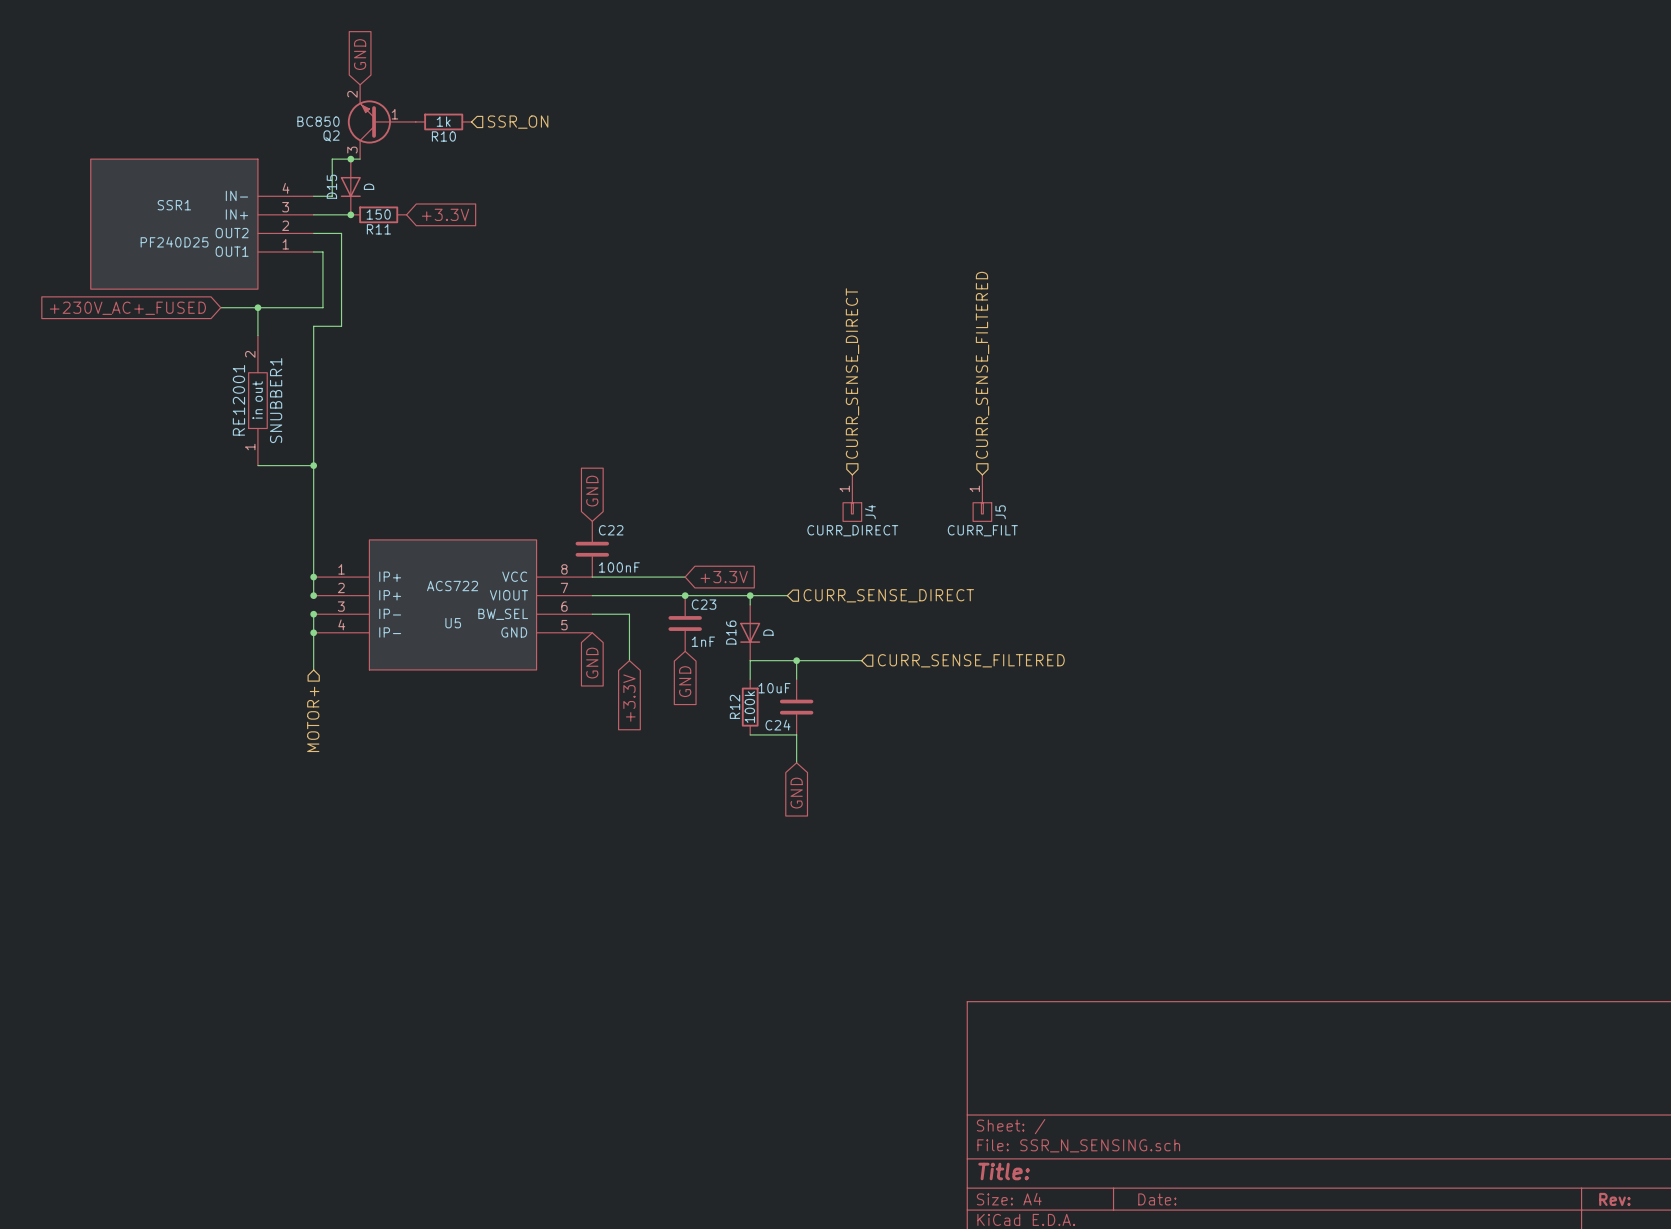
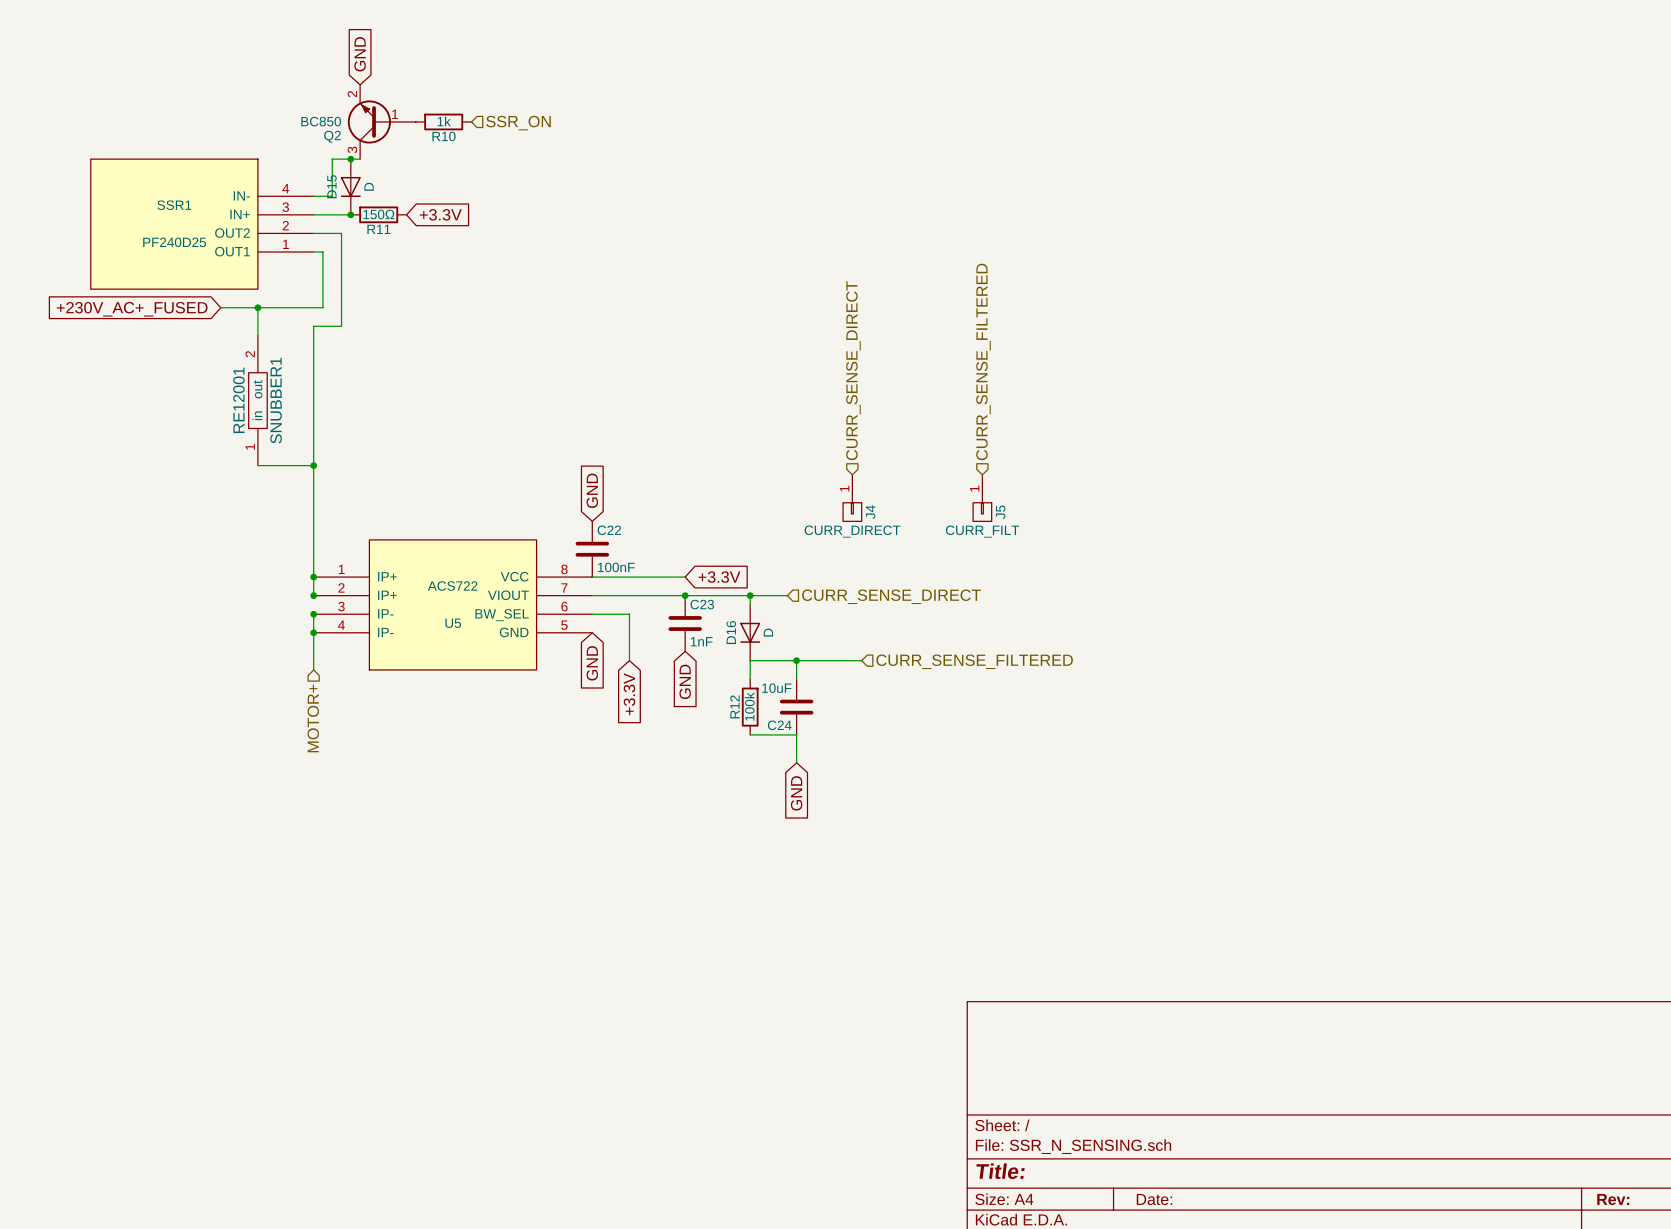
R11 value: 150 (378, 214) -> 150Ω (378, 214)

